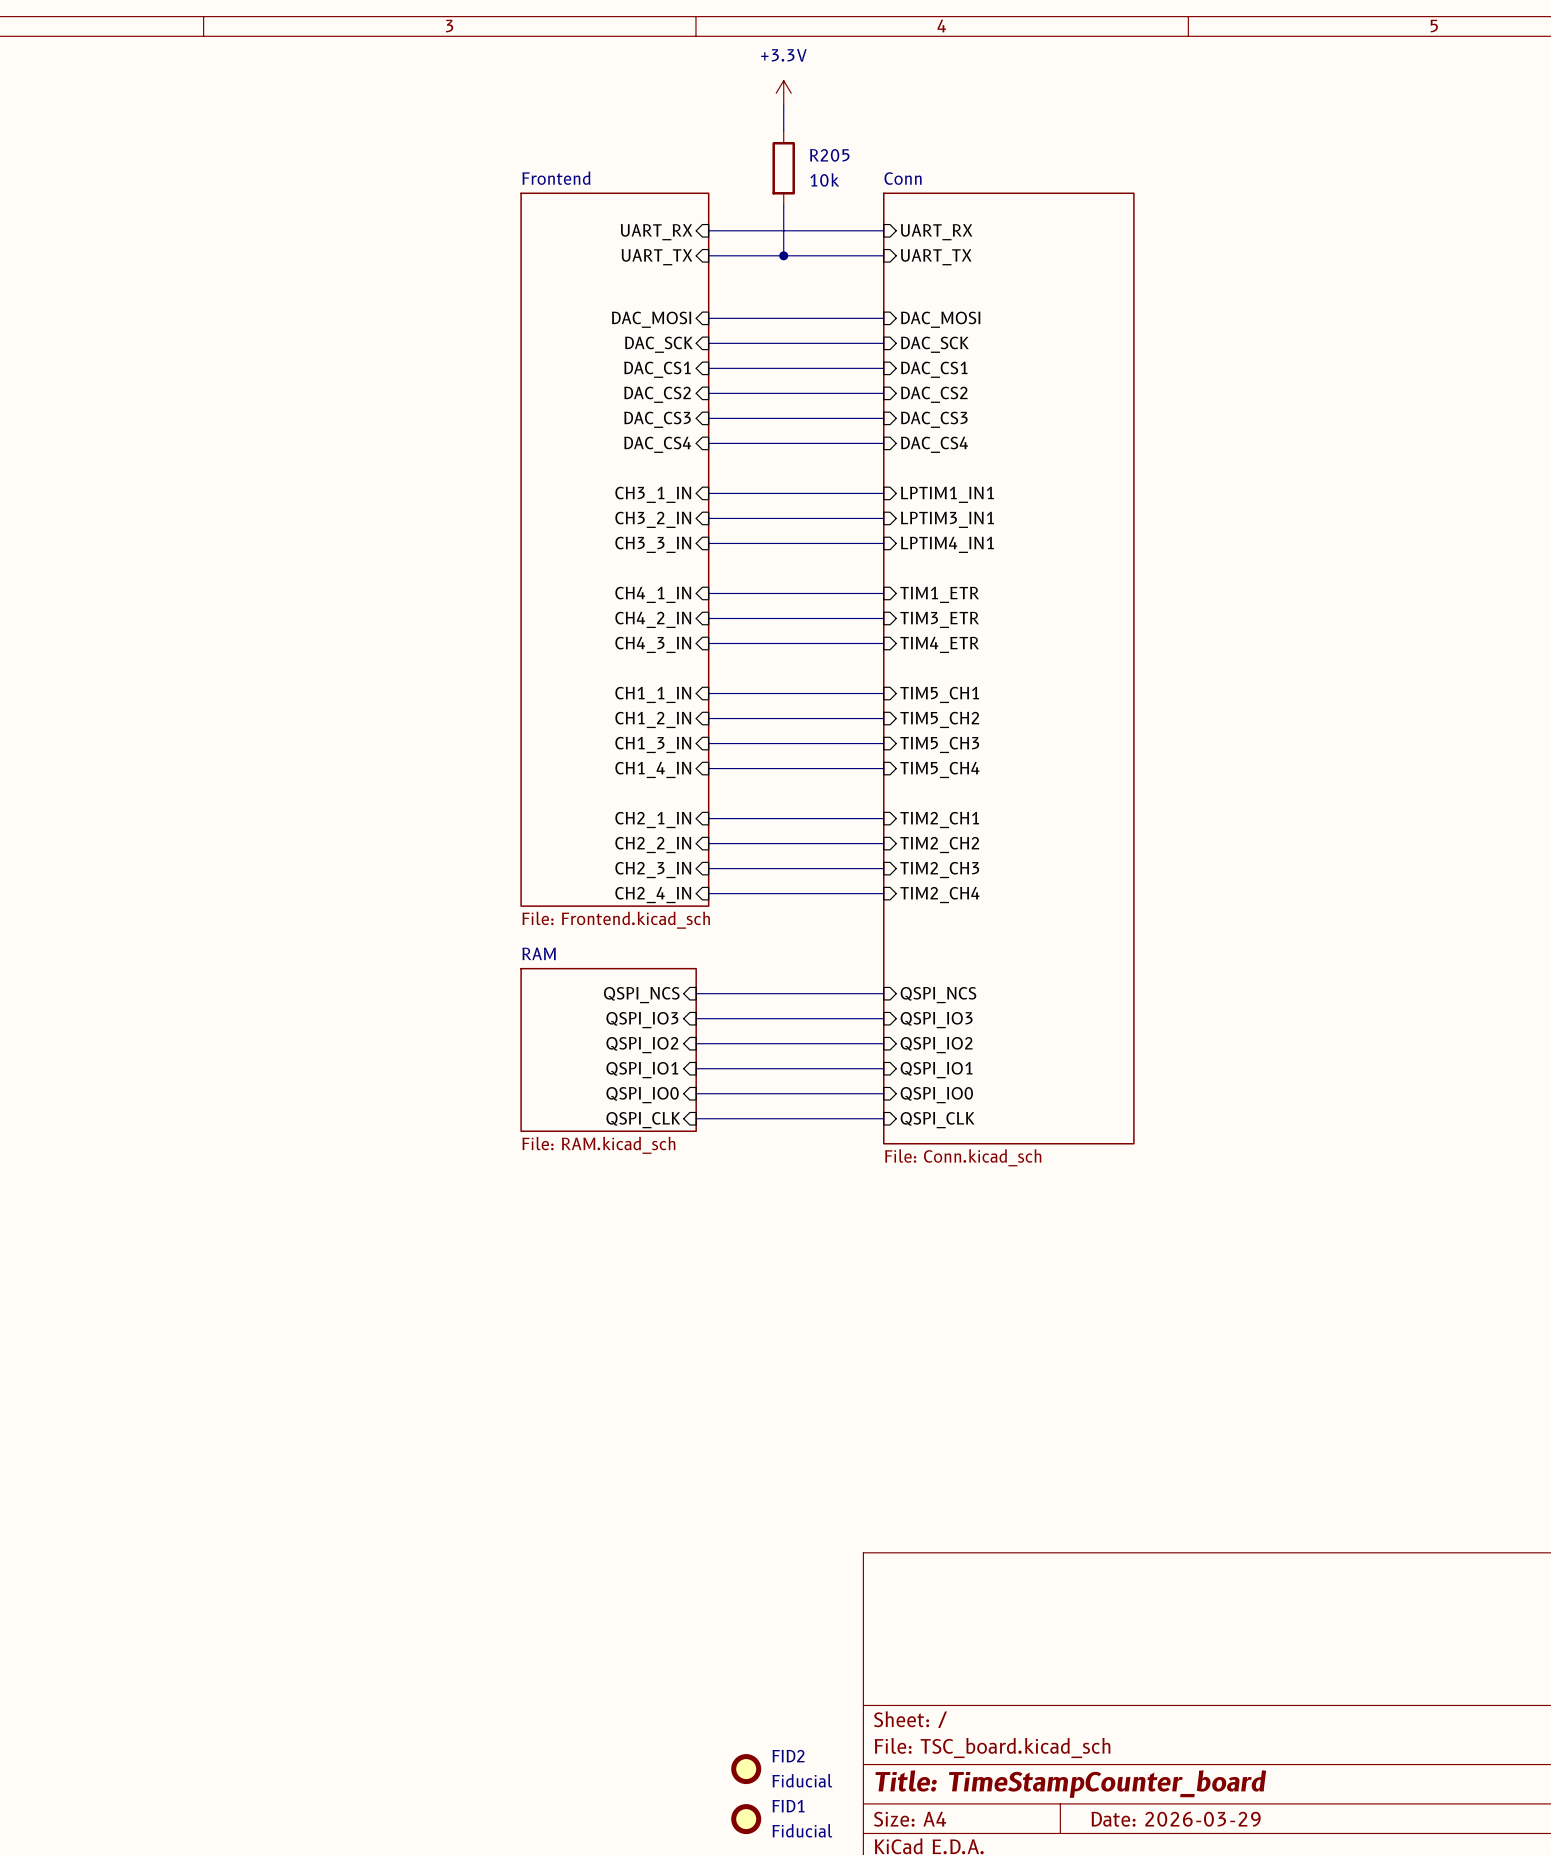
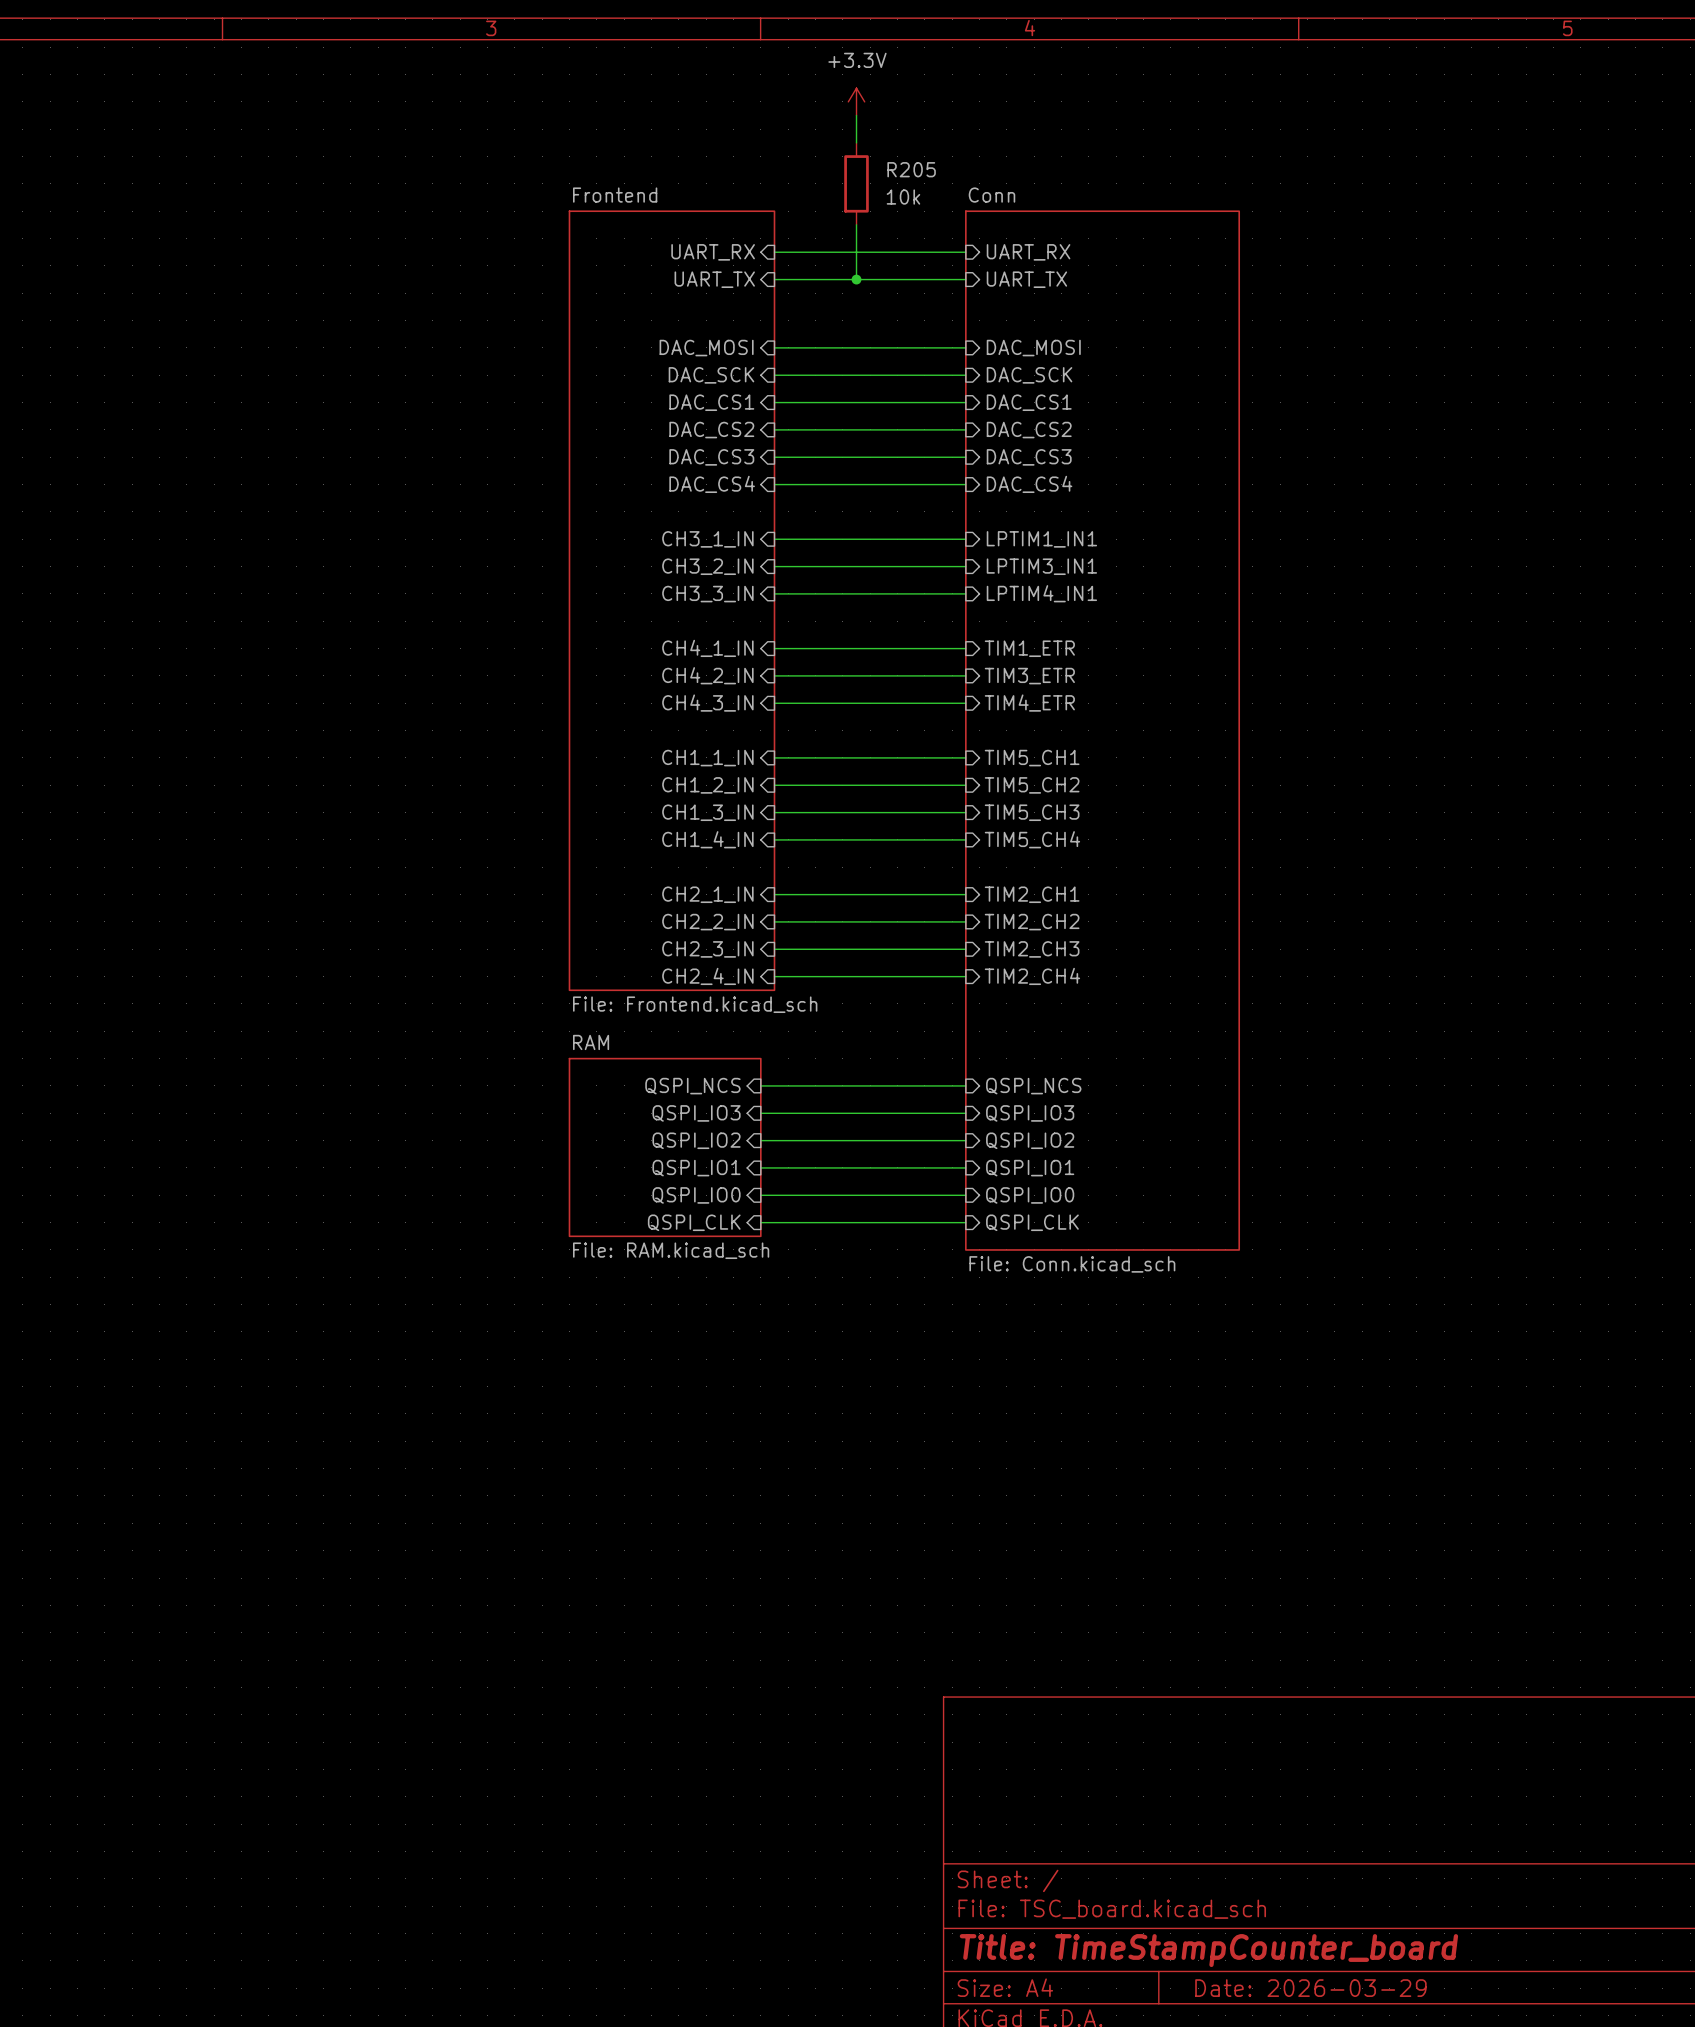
FID2: Fiducial (746, 1769) -> none
FID1: Fiducial (746, 1819) -> none

